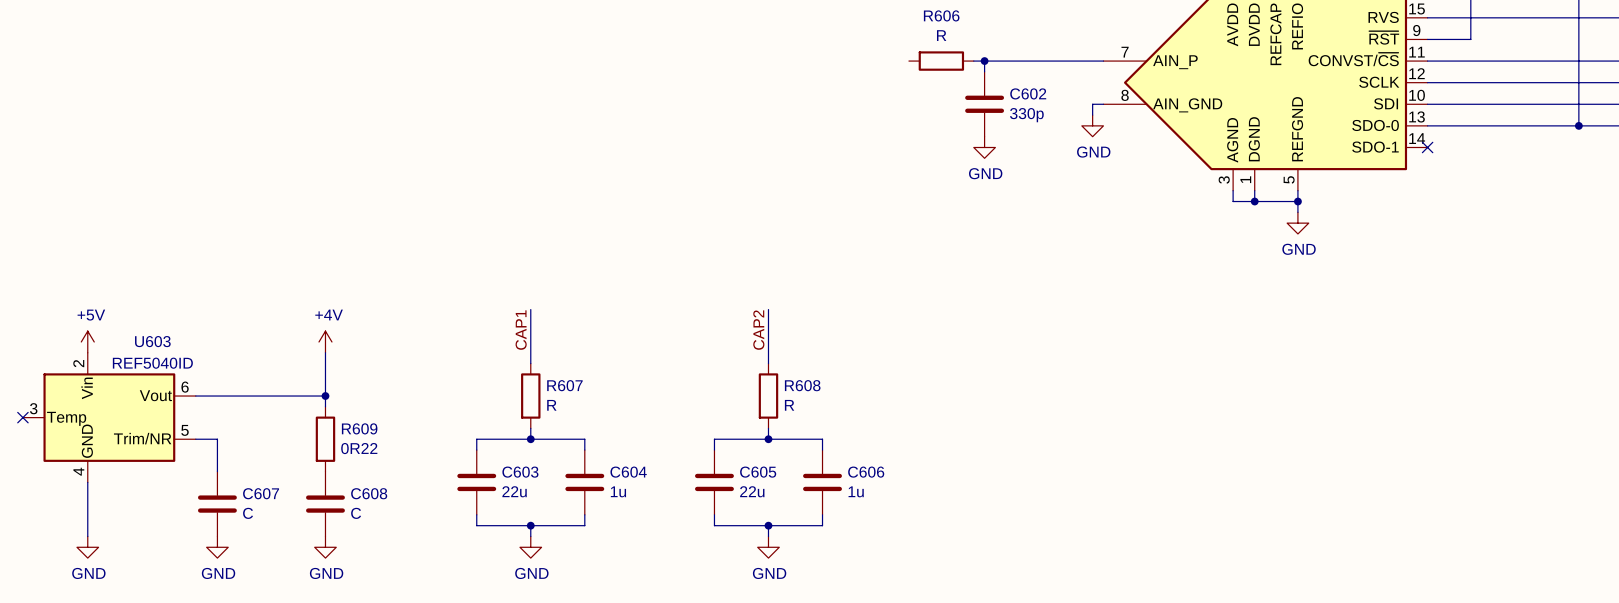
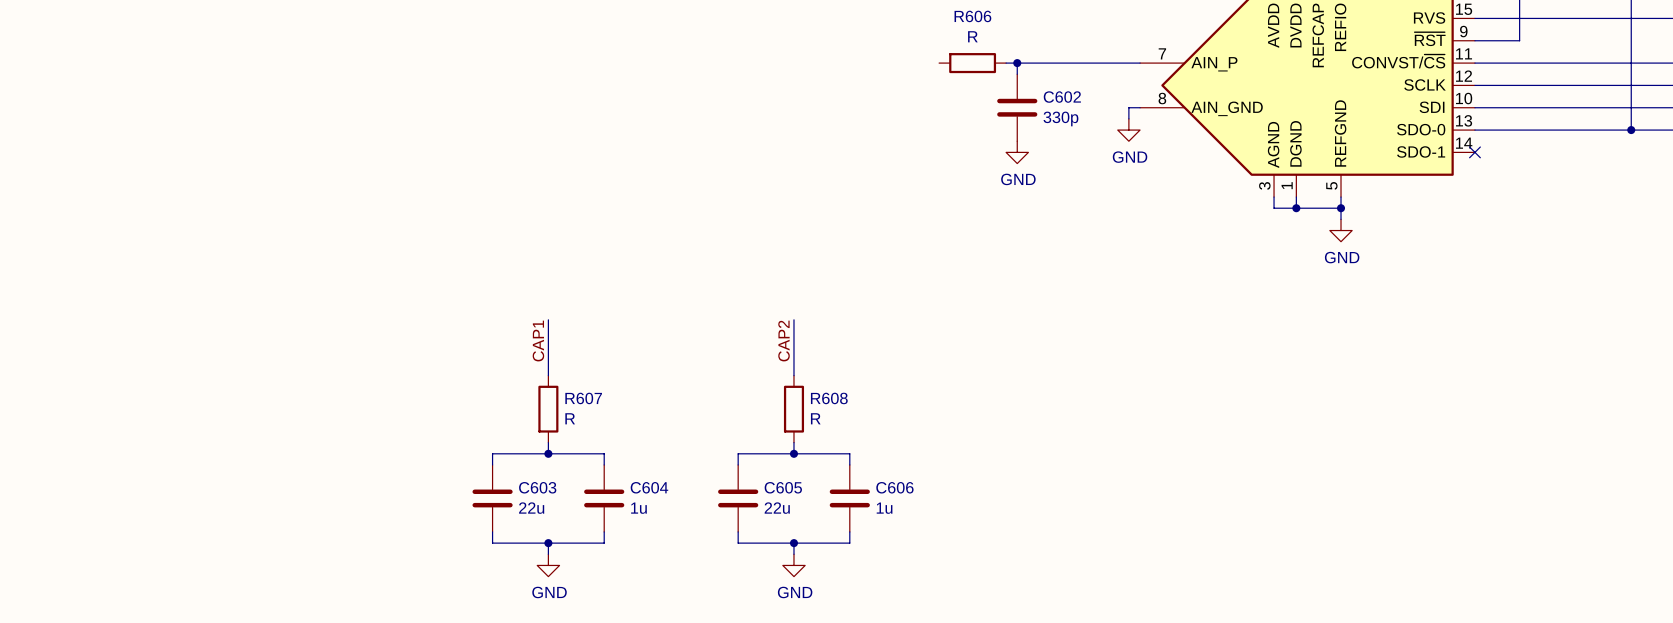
power symbol: +5V (87, 341) -> none
power symbol: +4V (325, 341) -> none
wire: (325, 352) (325, 406) -> none
wire: (195, 396) (325, 396) -> none
junction: (325, 396) -> none
no-connect mark: (22, 417) -> none
U603: REF5040ID (109, 417) -> none
wire: (195, 439) (217, 439) (217, 471) -> none
R609: 0R22 (325, 439) -> none
wire: (87, 482) (87, 536) -> none
C607: C (217, 504) -> none
C608: C (325, 504) -> none
power symbol: GND (87, 547) -> none
power symbol: GND (217, 547) -> none
power symbol: GND (325, 547) -> none

